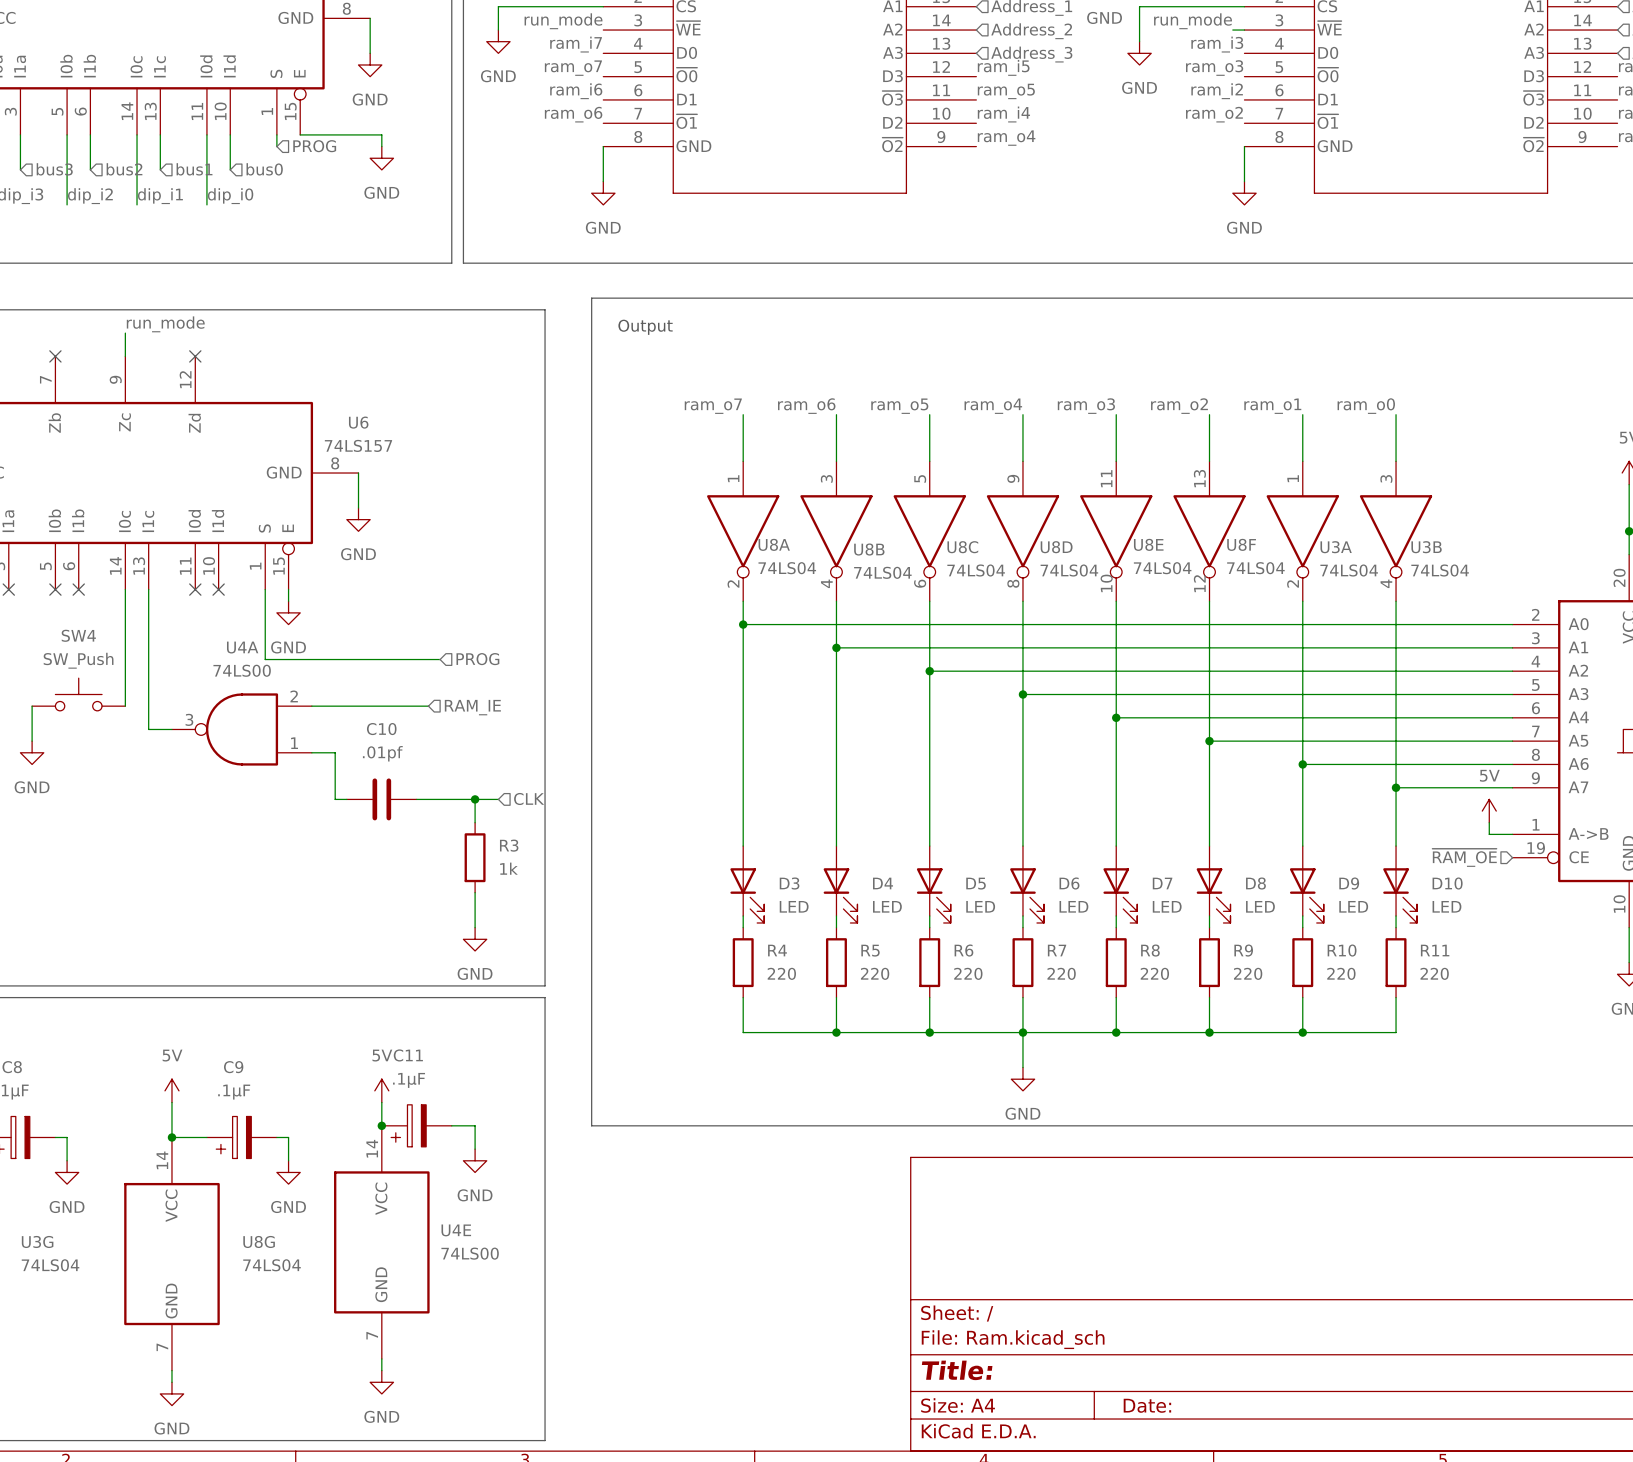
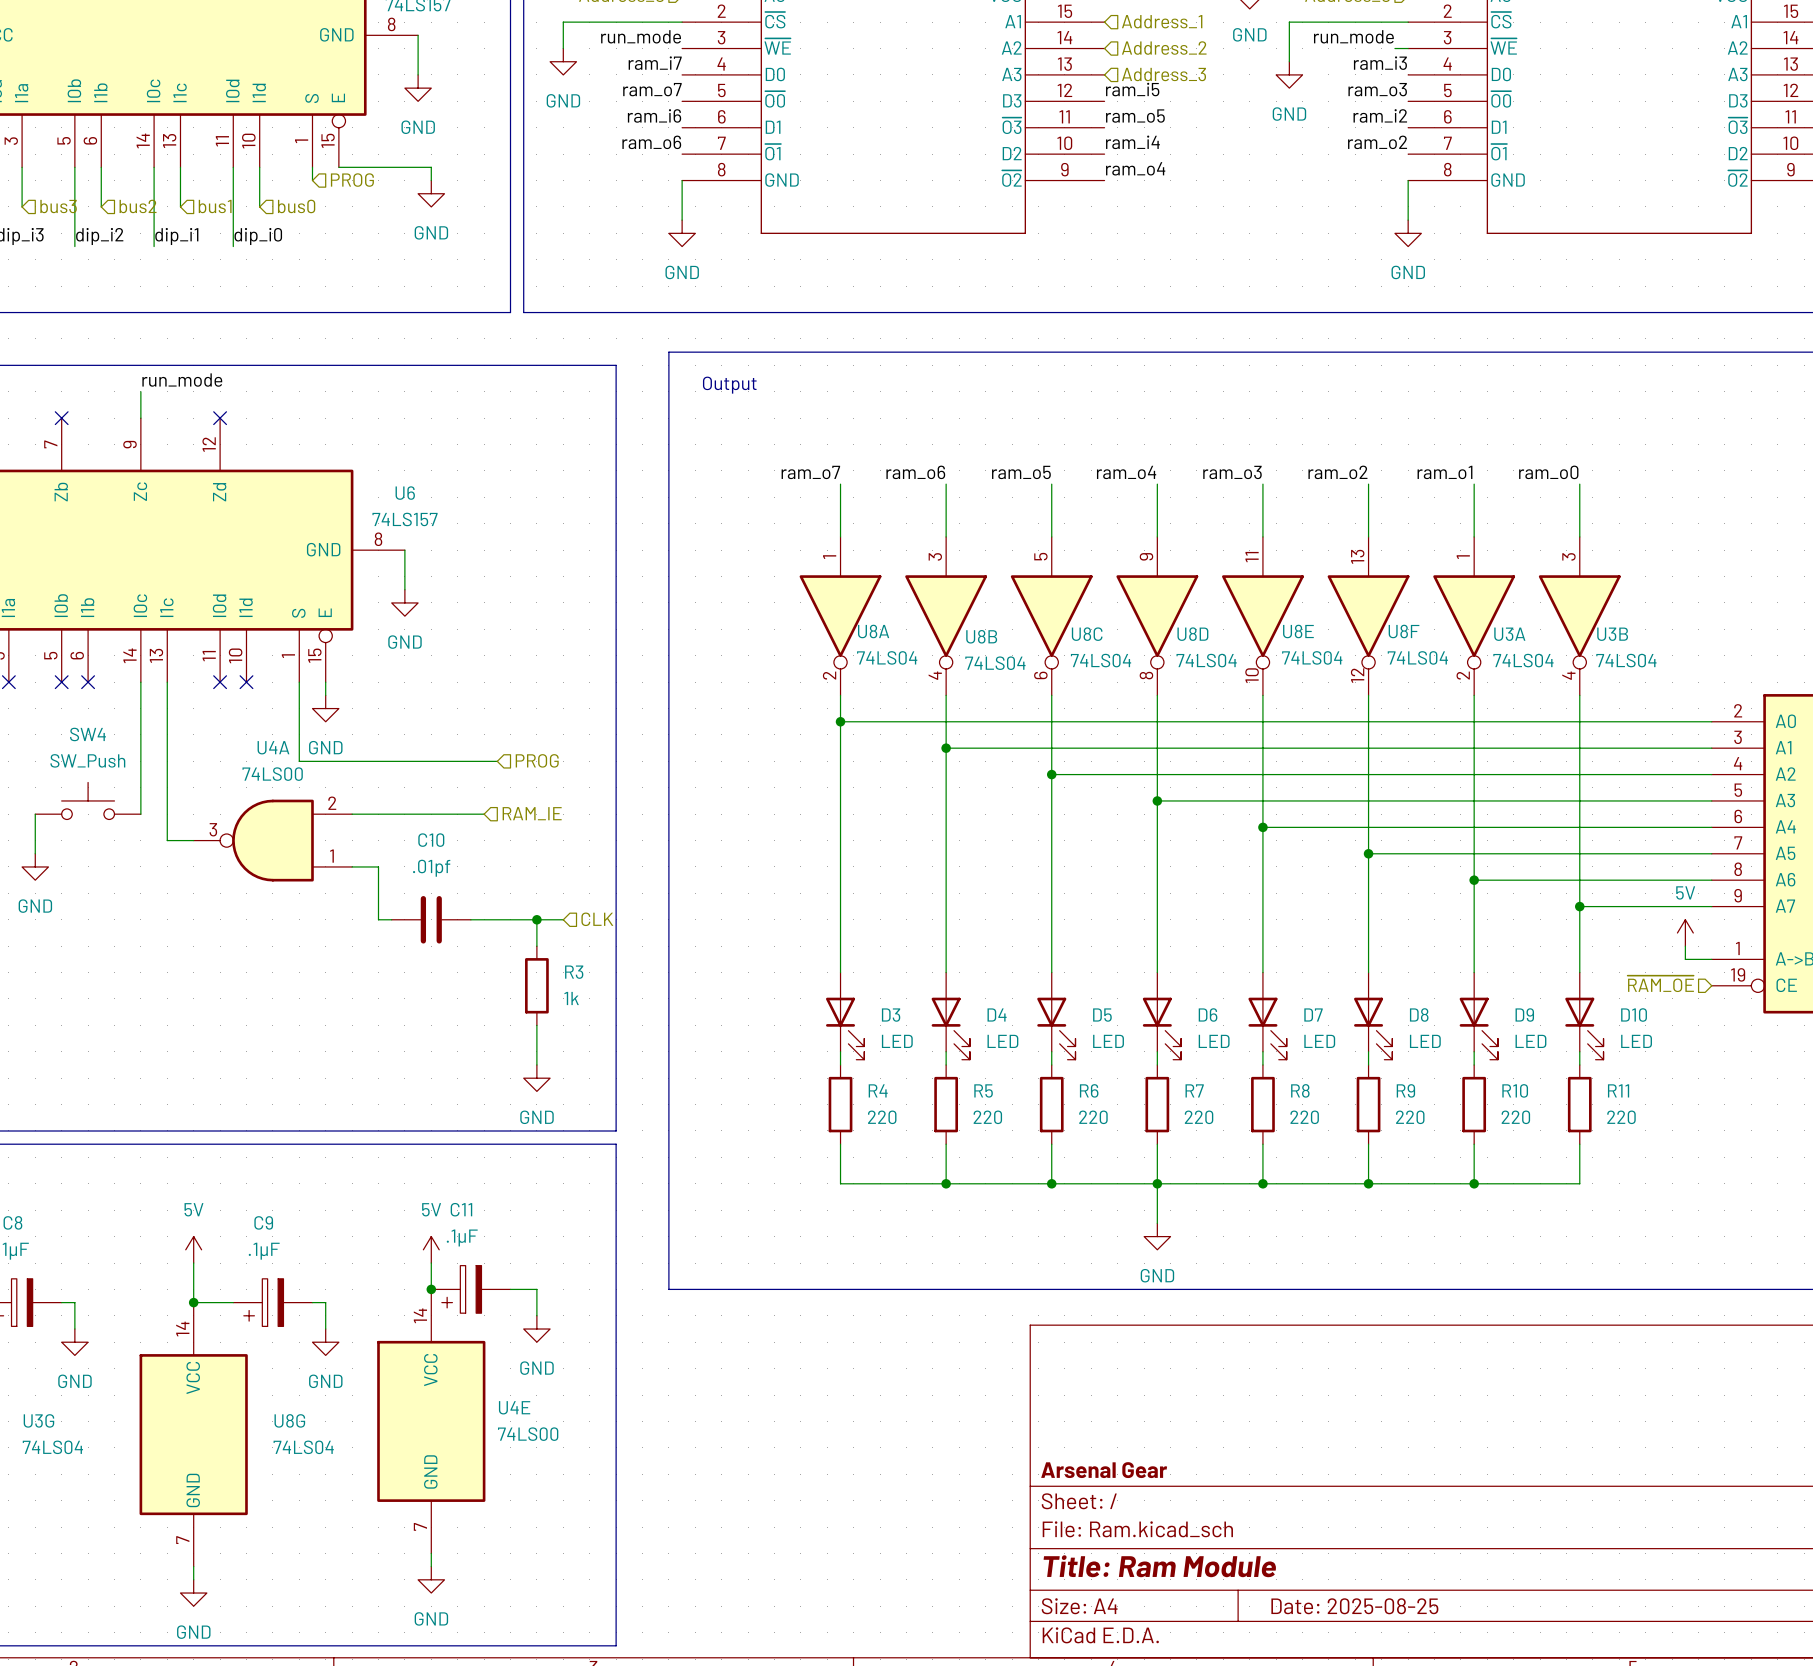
title block: none -> Arsenal Gear (1104, 1470)
title block: Title: (957, 1370) -> Title: Ram Module (1159, 1566)
title block: Date: (1147, 1405) -> Date: 2025-08-25 (1354, 1606)

